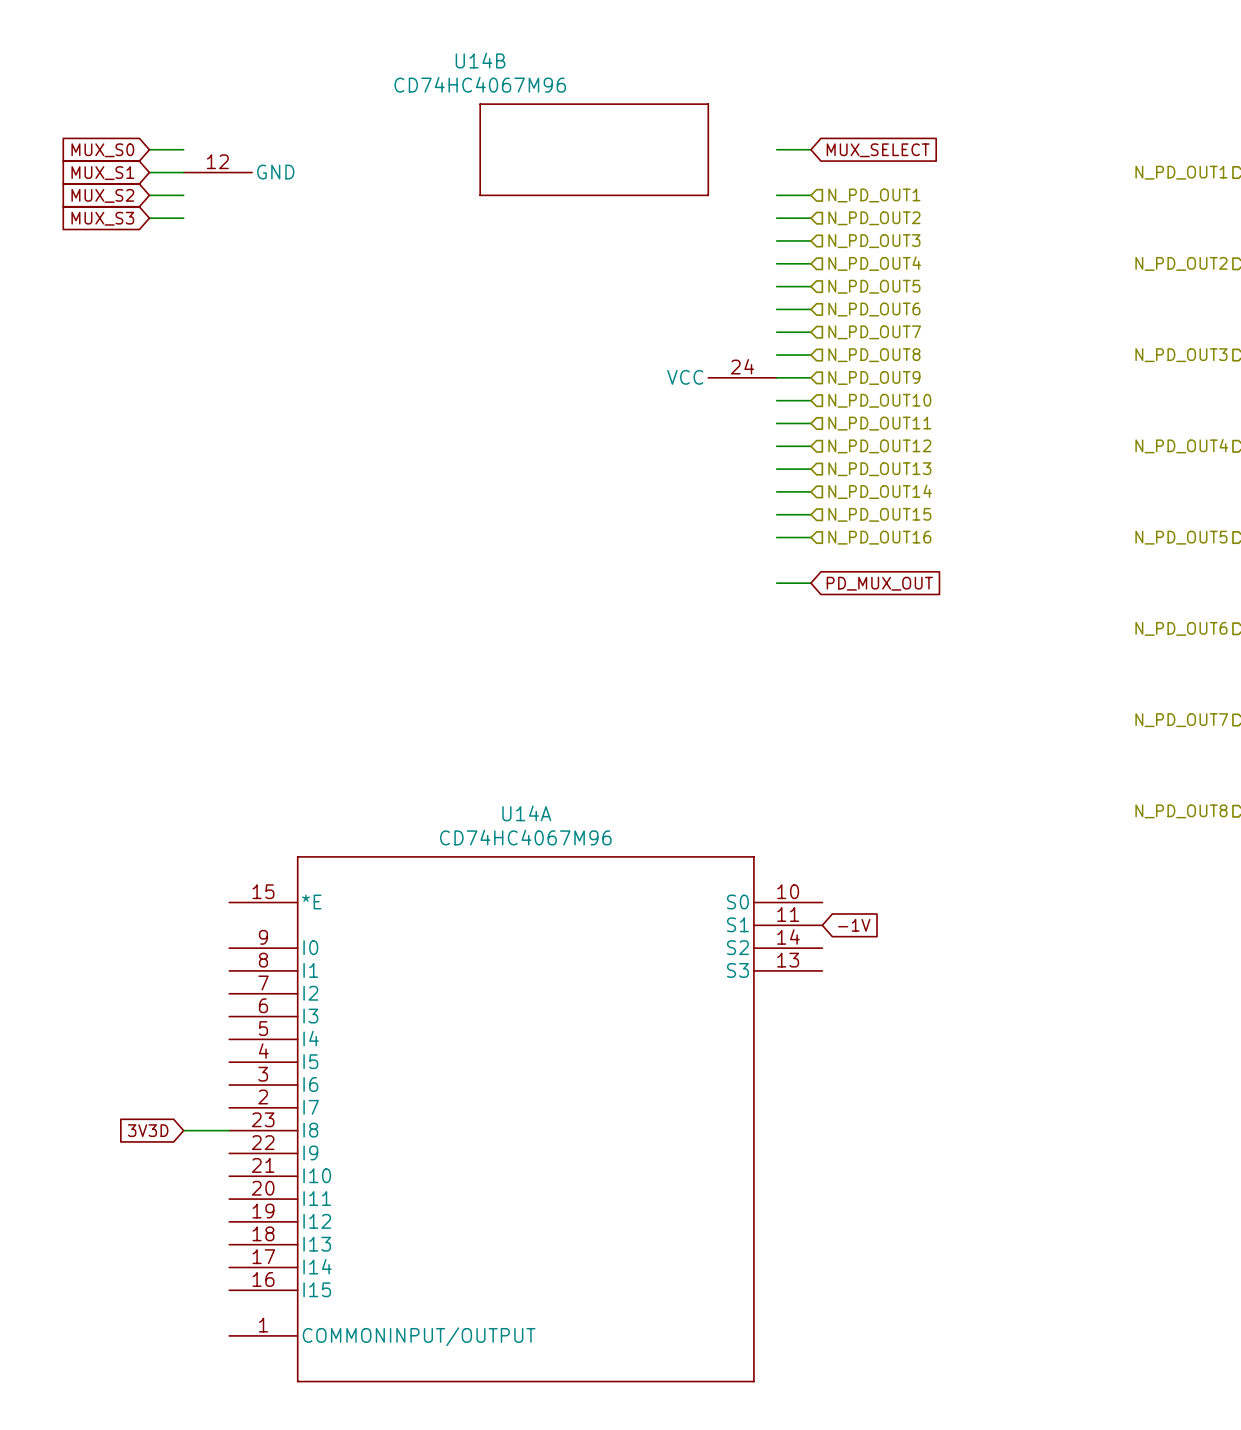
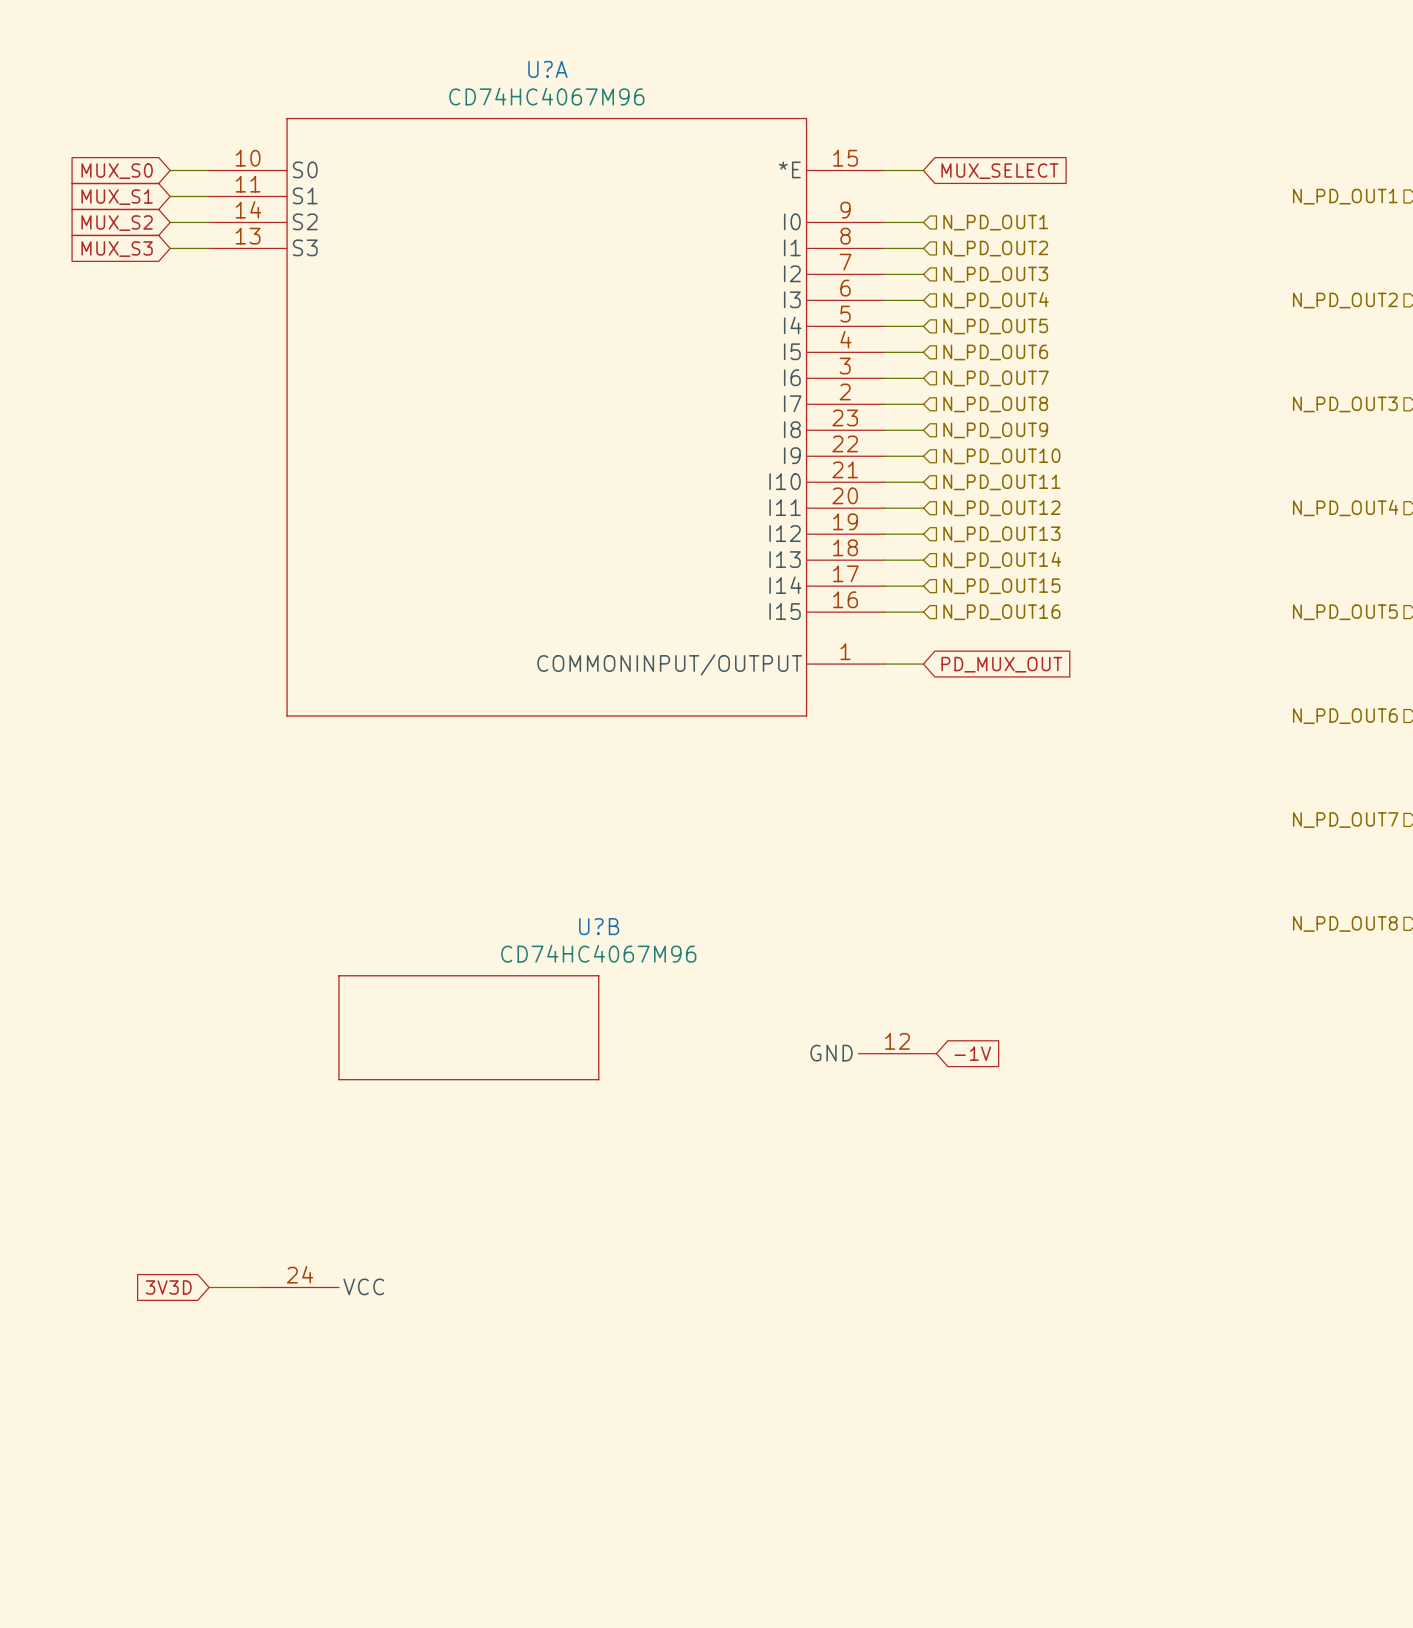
U14B: CD74HC4067M96 (480, 240) -> none
U?A: none -> CD74HC4067M96 (546, 417)
U?B: none -> CD74HC4067M96 (598, 1131)
U14A: CD74HC4067M96 (525, 1119) -> none

